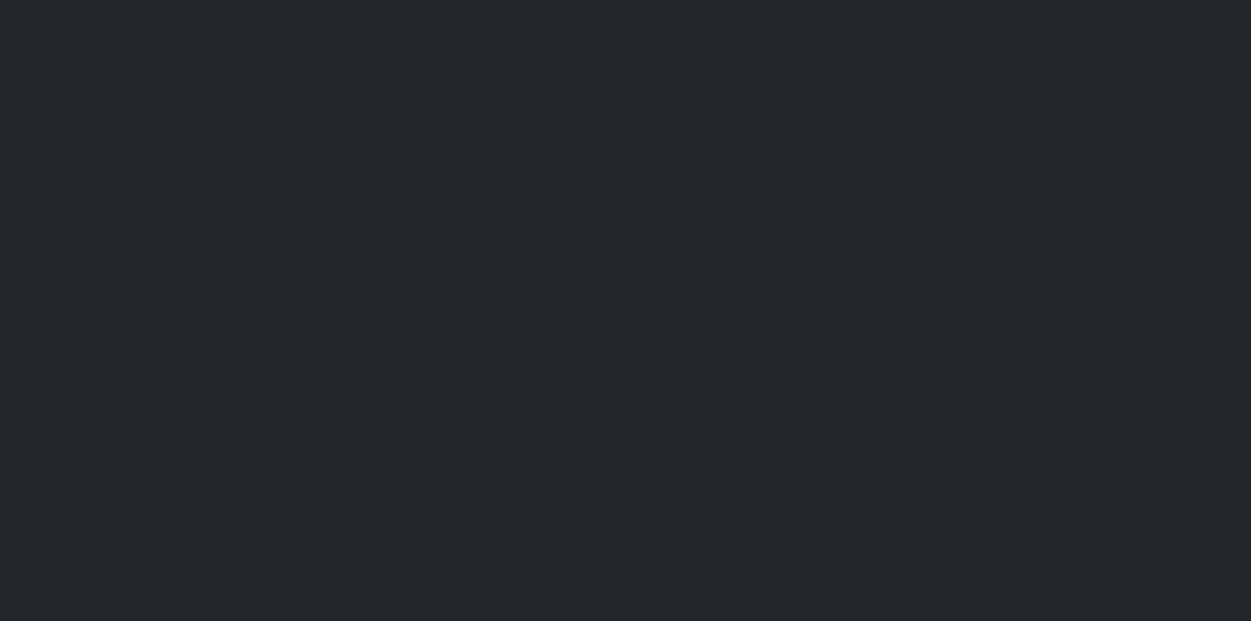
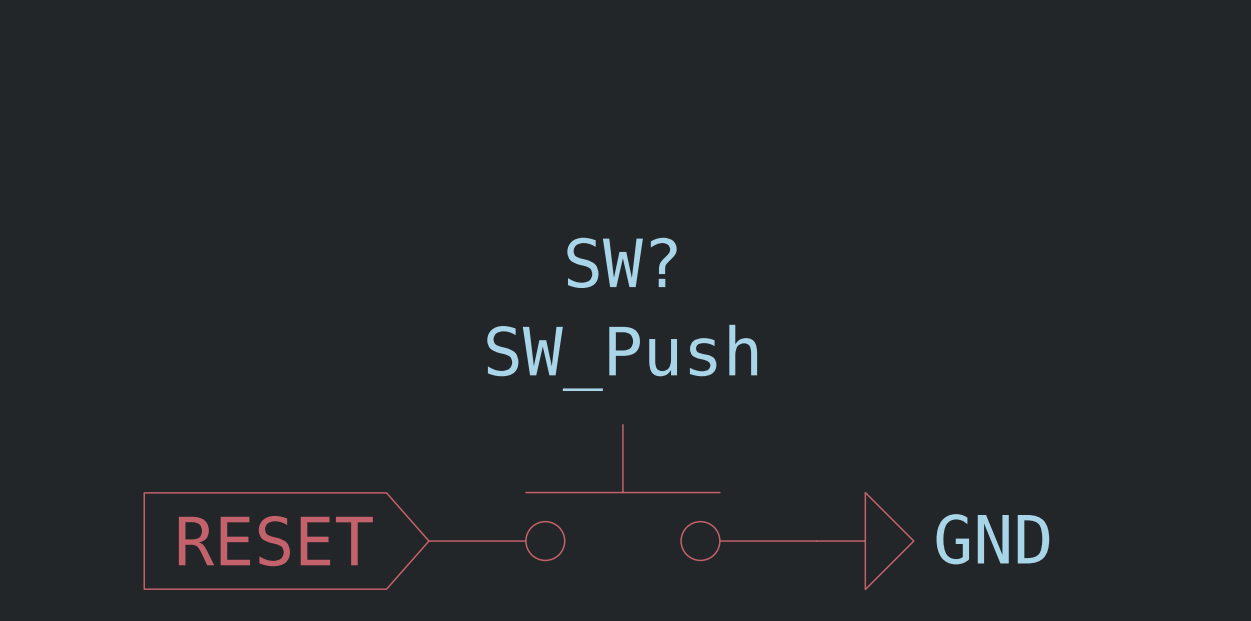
SW?: none -> SW_Push (622, 492)
global label: none -> RESET (275, 541)
power symbol: none -> GND (865, 541)

